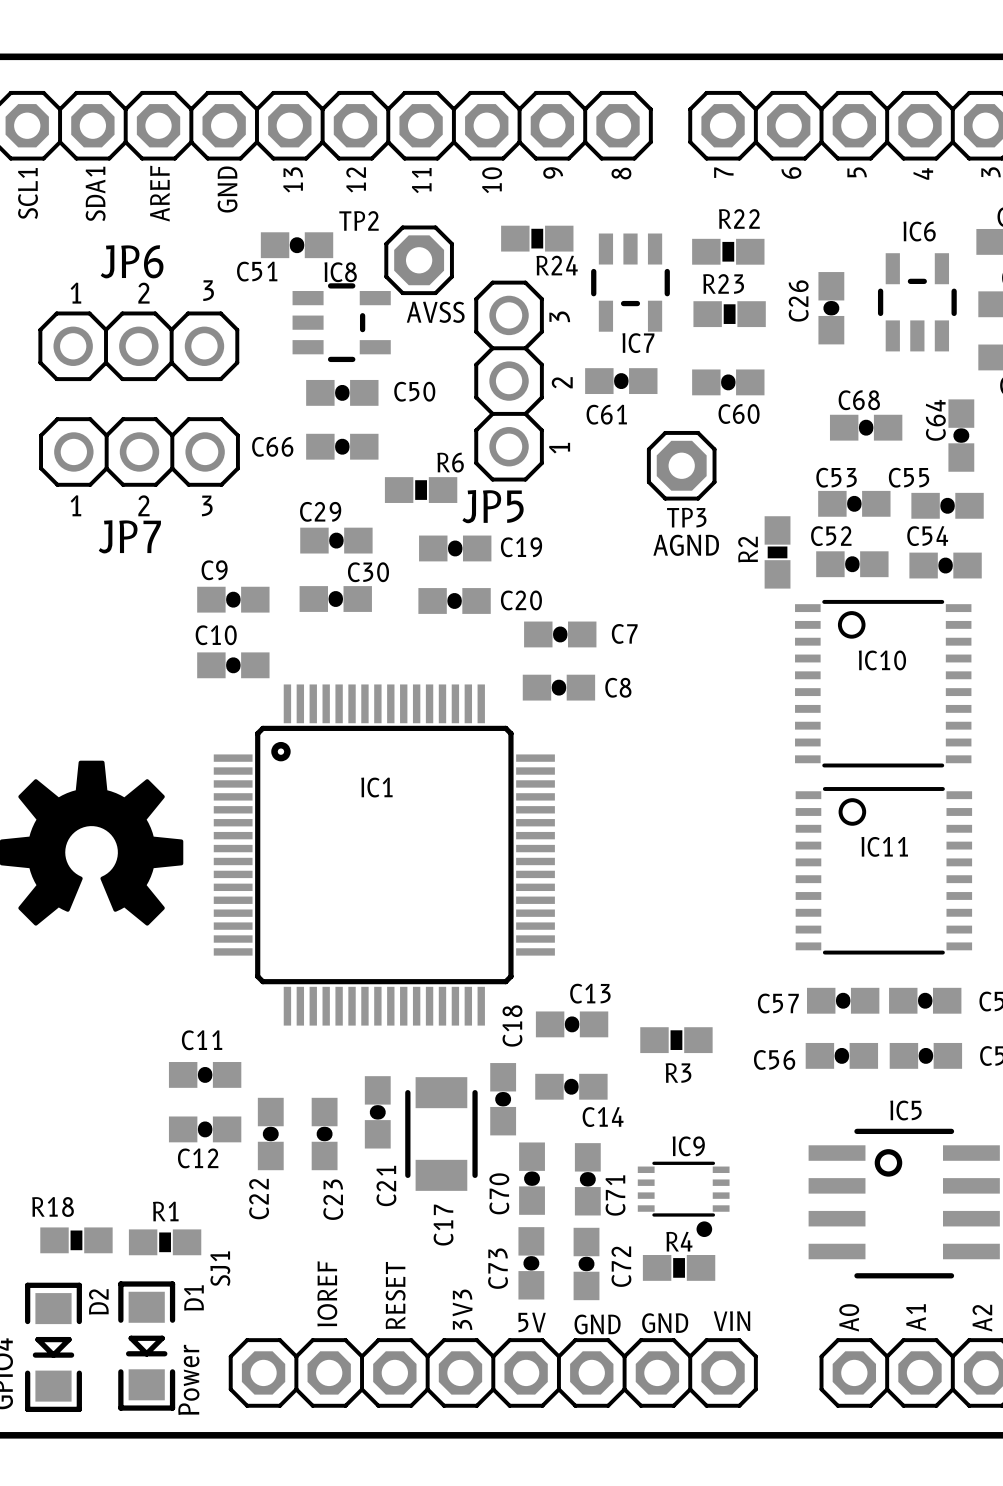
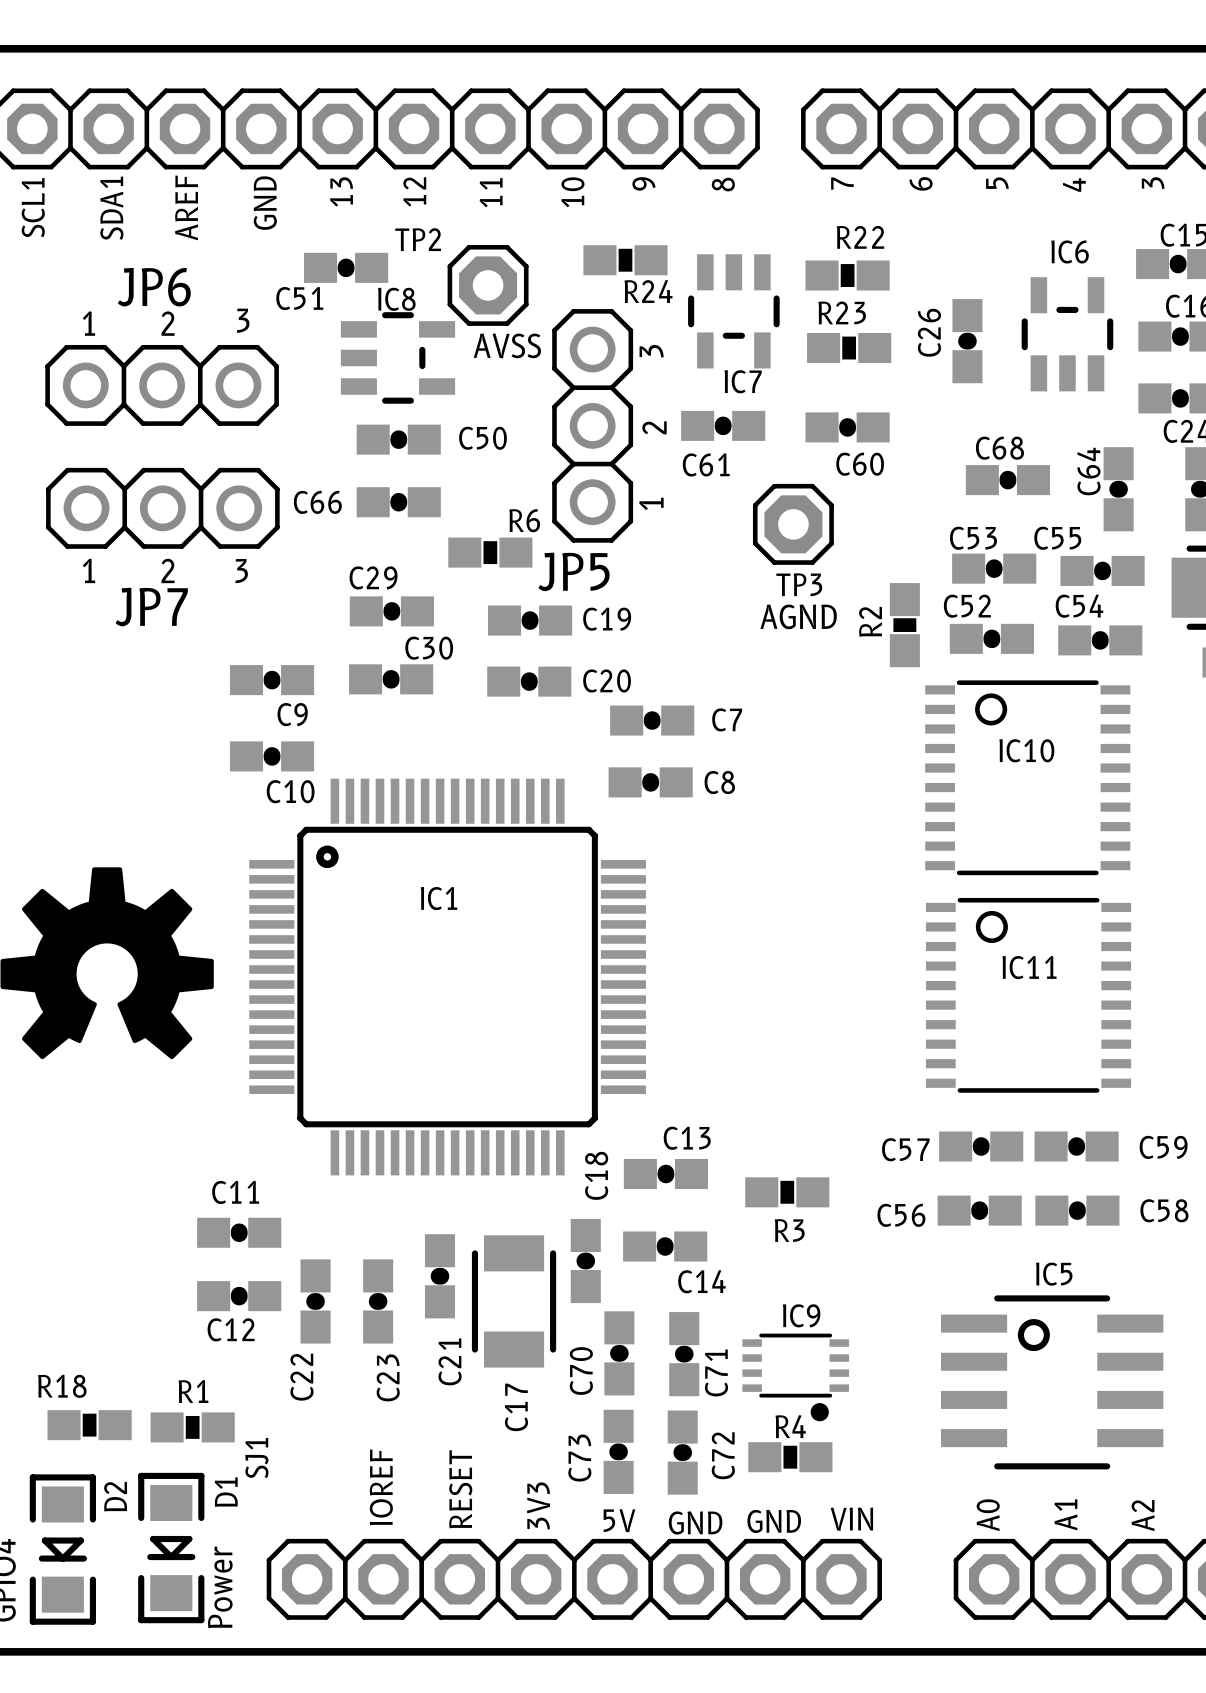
C9 name position: C9 (214, 570) -> C9 (292, 714)
C10 name position: C10 (216, 635) -> C10 (290, 791)

